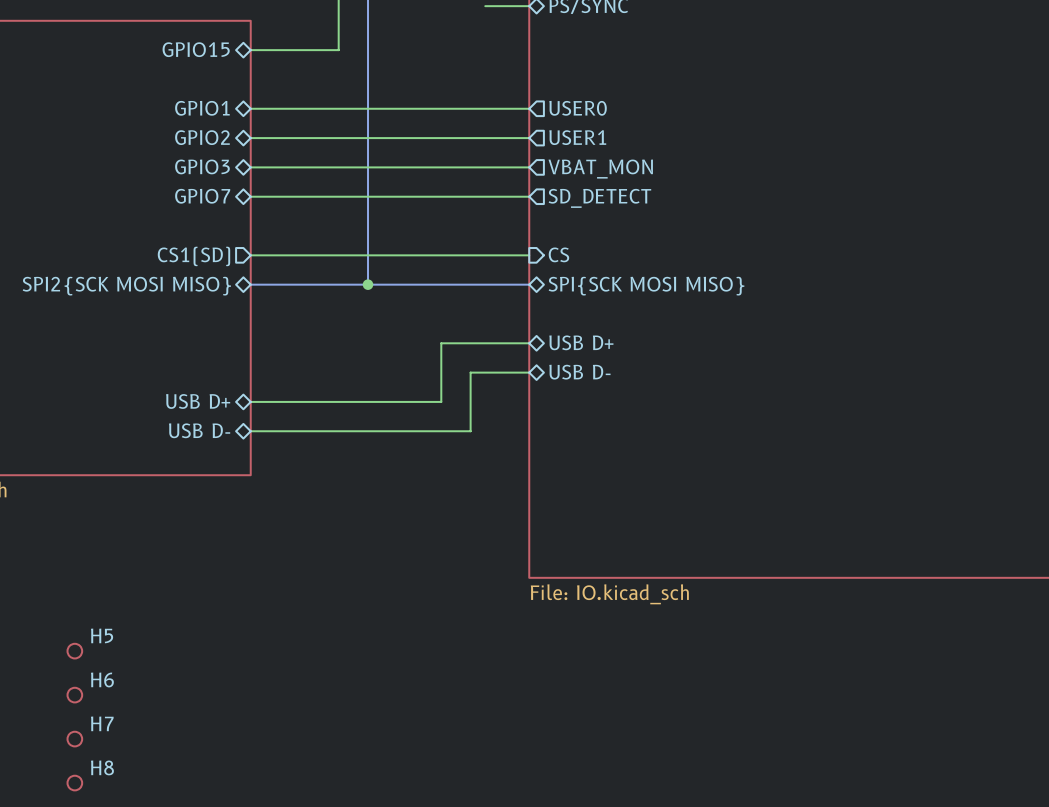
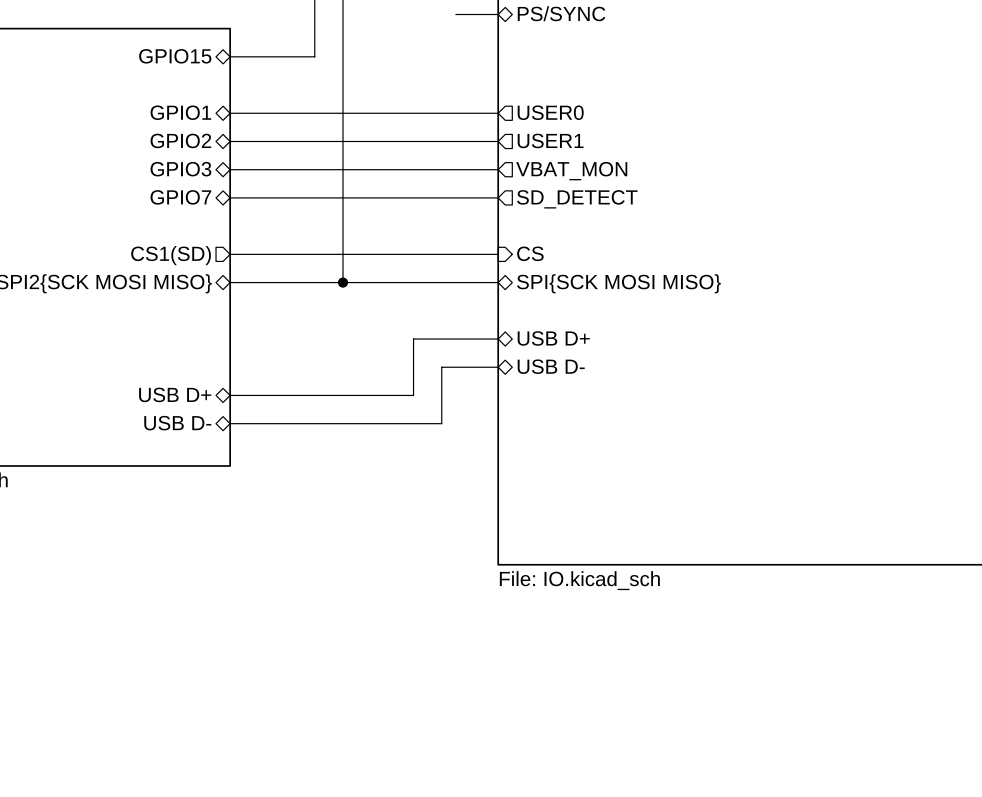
H5: (74, 651) -> none
H6: (74, 695) -> none
H7: (74, 739) -> none
H8: (74, 783) -> none

